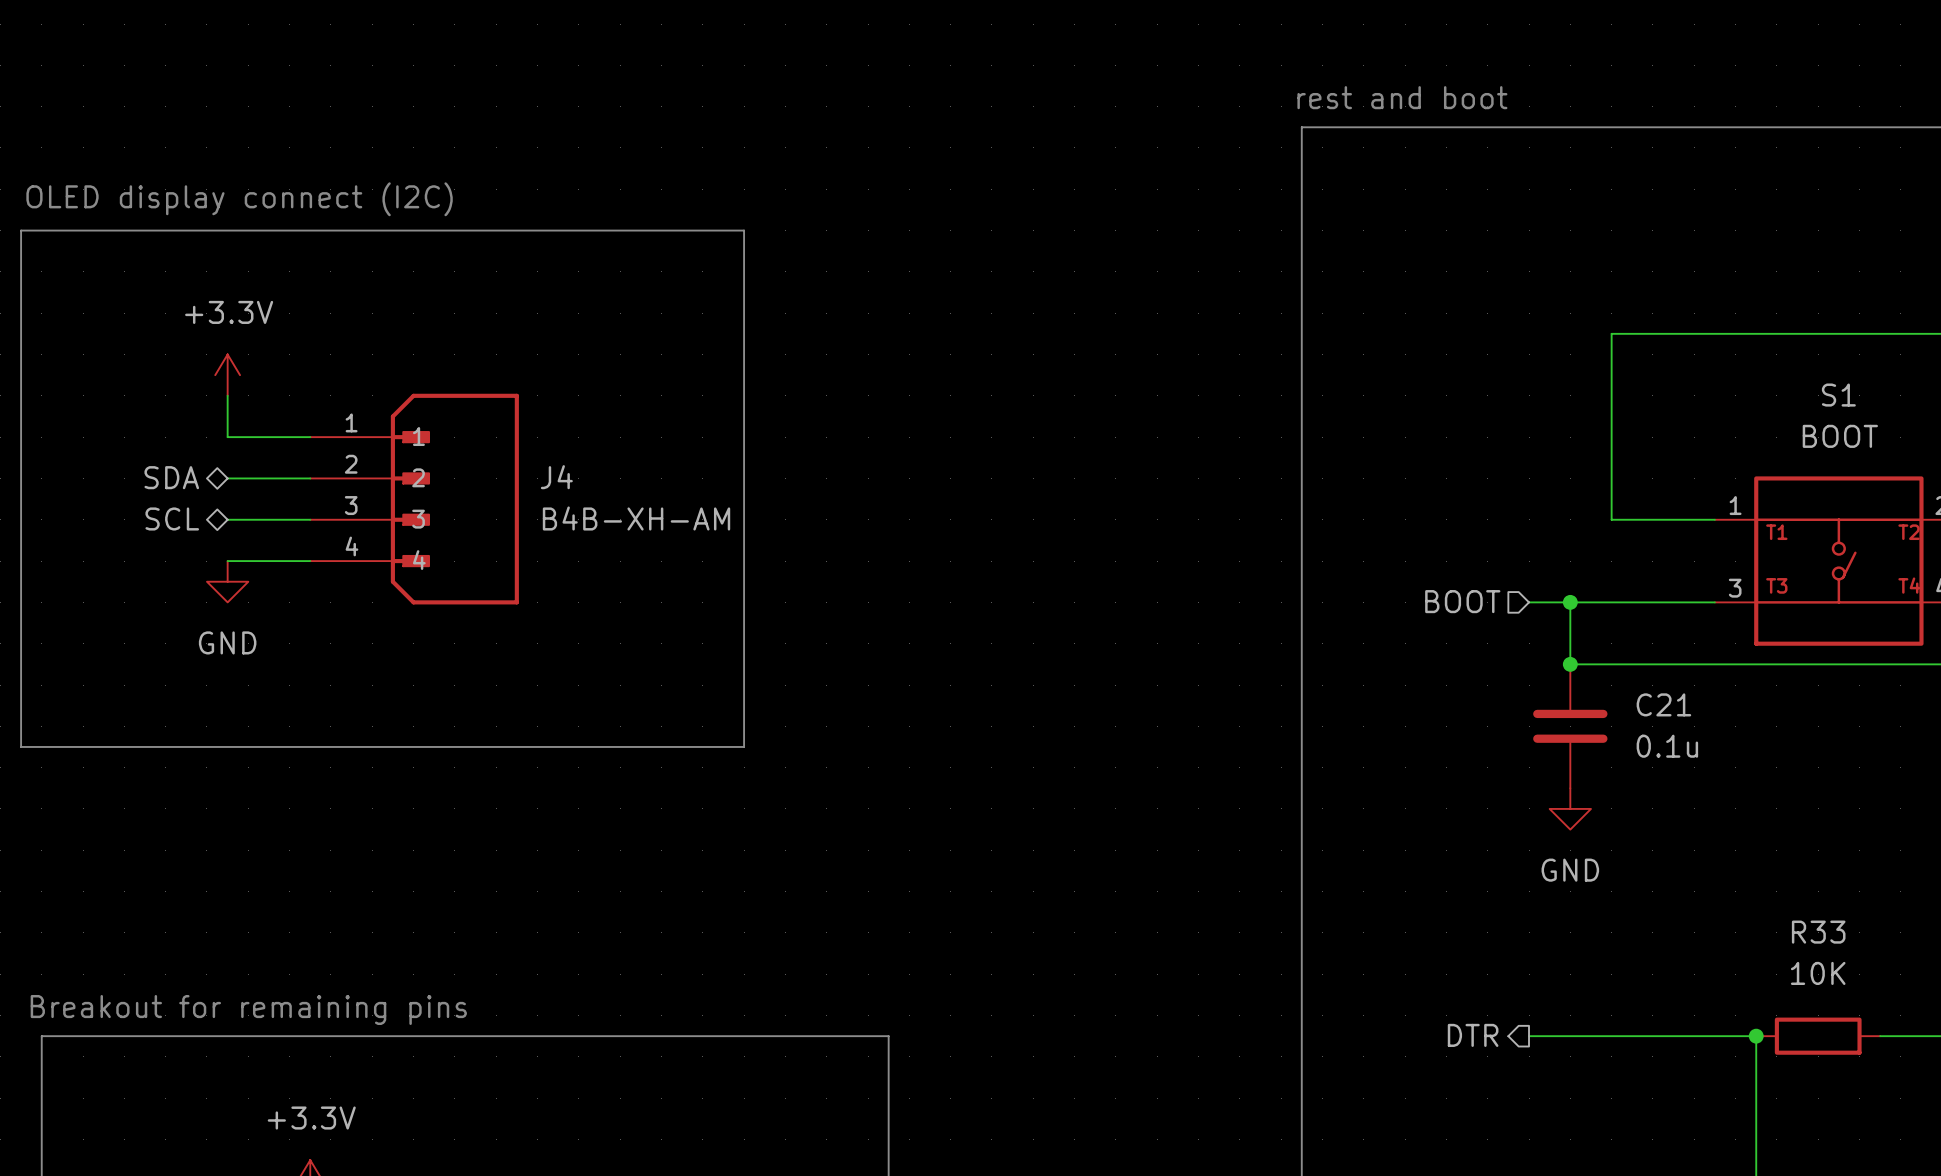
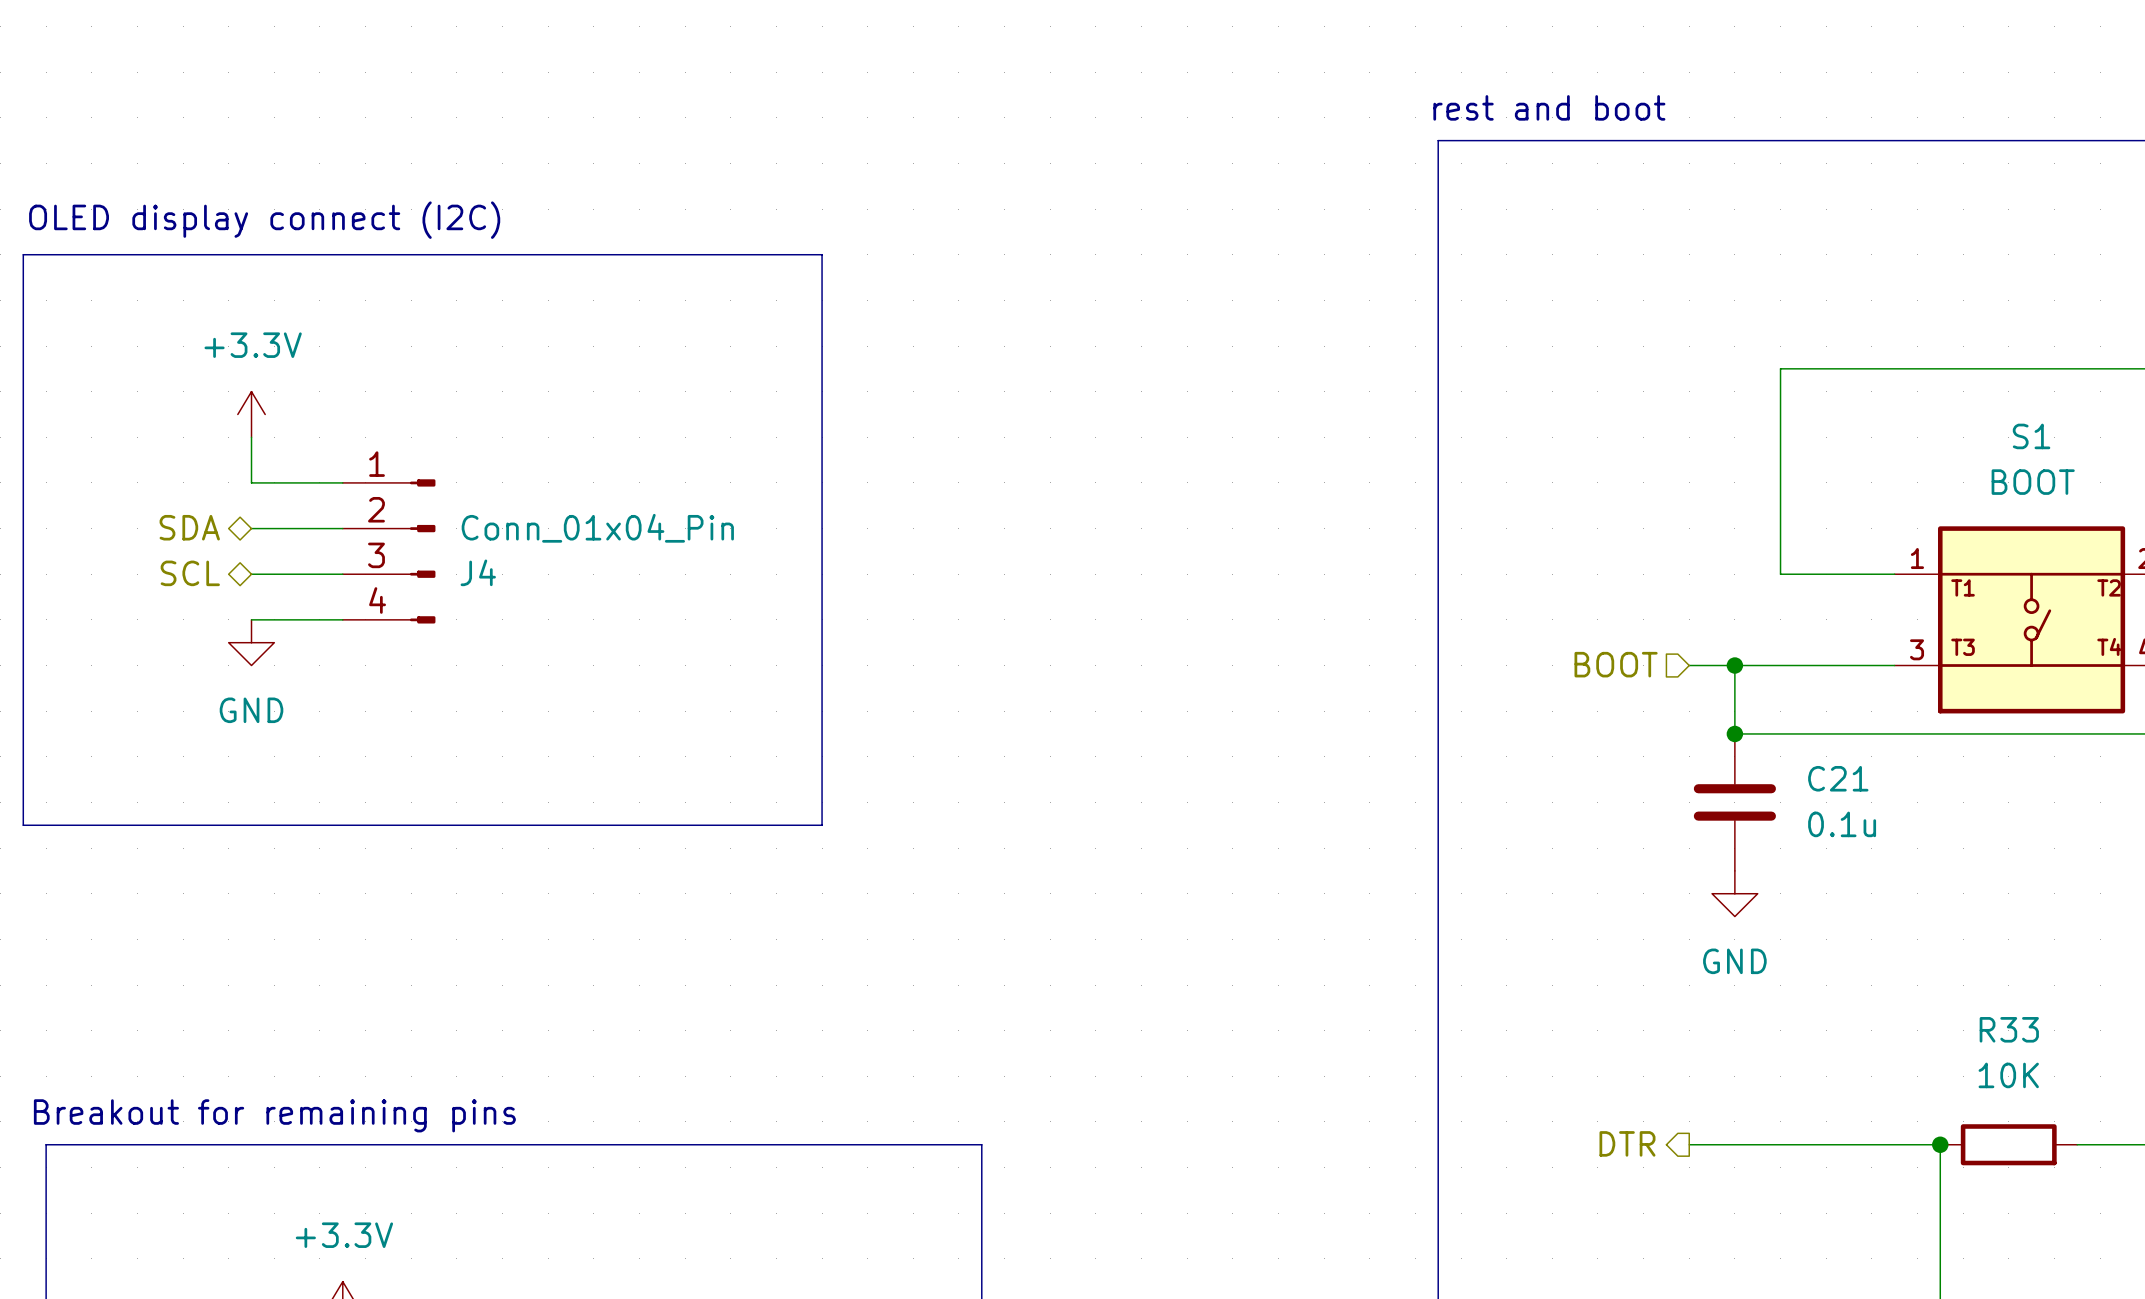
J4 symbol: [310, 393, 519, 605] -> [342, 479, 436, 624]
J4 name position: J4 (556, 477) -> J4 (478, 572)
J4 value: B4B-XH-AM (636, 518) -> Conn_01x04_Pin (597, 528)

